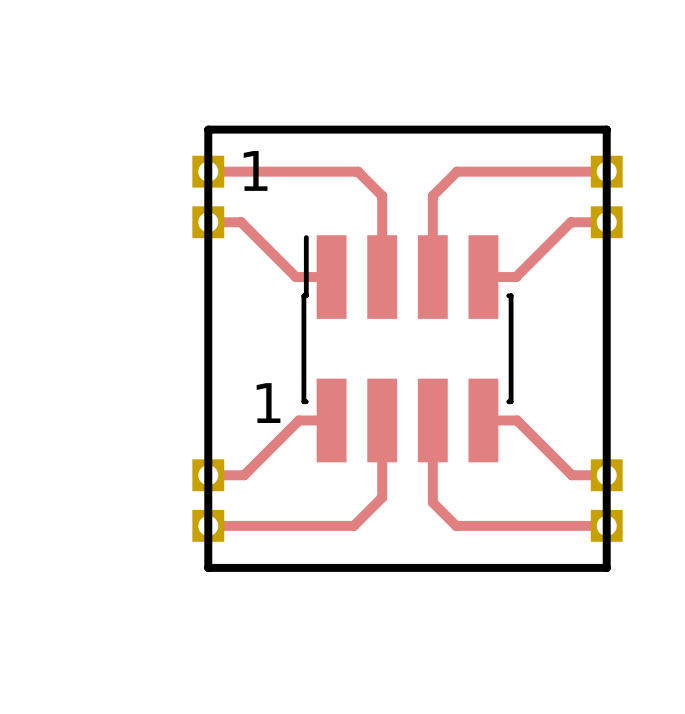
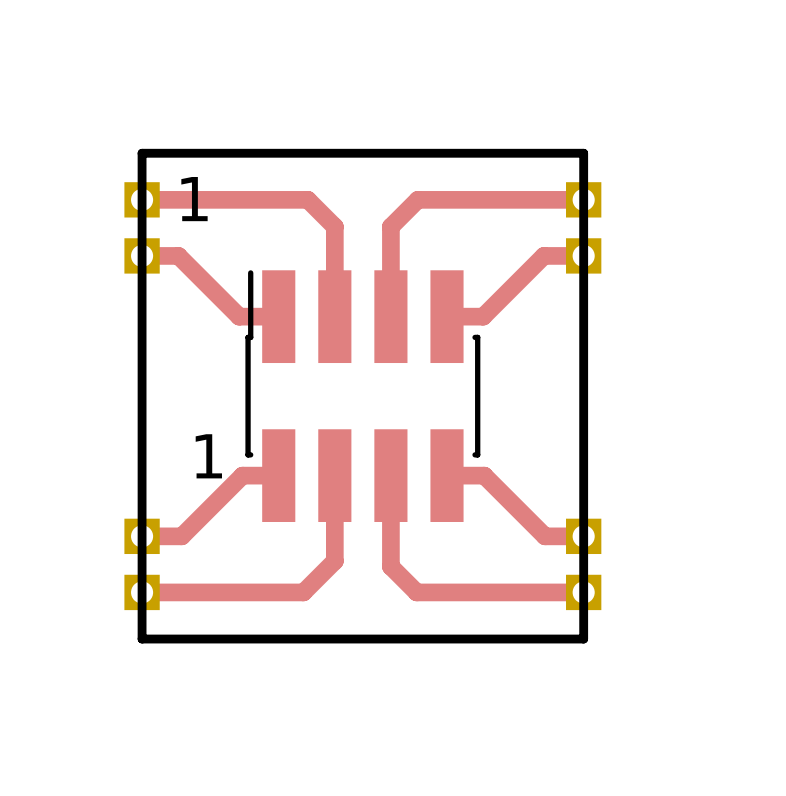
top track width: thin (208, 171) (357, 171) (382, 195) (382, 277) -> thick (142, 199) (307, 199) (334, 226) (334, 316)
top track width: thin (606, 171) (457, 171) (432, 195) (432, 277) -> thick (583, 199) (417, 199) (390, 226) (390, 316)
top track width: thin (208, 222) (241, 222) (295, 277) (331, 277) -> thick (142, 255) (178, 255) (239, 316) (278, 316)
top track width: thin (606, 222) (570, 222) (516, 277) (483, 277) -> thick (583, 255) (543, 255) (483, 316) (447, 316)
top track width: thin (331, 420) (298, 420) (244, 475) (208, 475) -> thick (278, 475) (242, 475) (181, 536) (142, 536)
top track width: thin (382, 420) (382, 497) (353, 525) (208, 525) -> thick (334, 475) (334, 561) (303, 592) (142, 592)
top track width: thin (432, 420) (432, 502) (456, 525) (606, 525) -> thick (390, 475) (390, 566) (416, 592) (583, 592)
top track width: thin (483, 420) (517, 420) (571, 475) (606, 475) -> thick (447, 475) (484, 475) (545, 536) (583, 536)

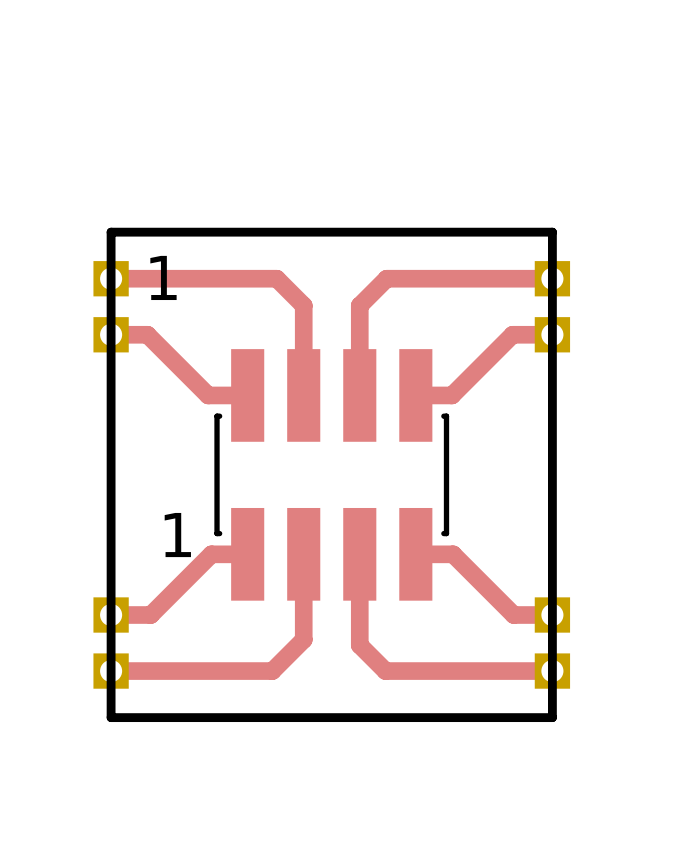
part footprint: [245, 270, 481, 523] -> [214, 349, 450, 601]

